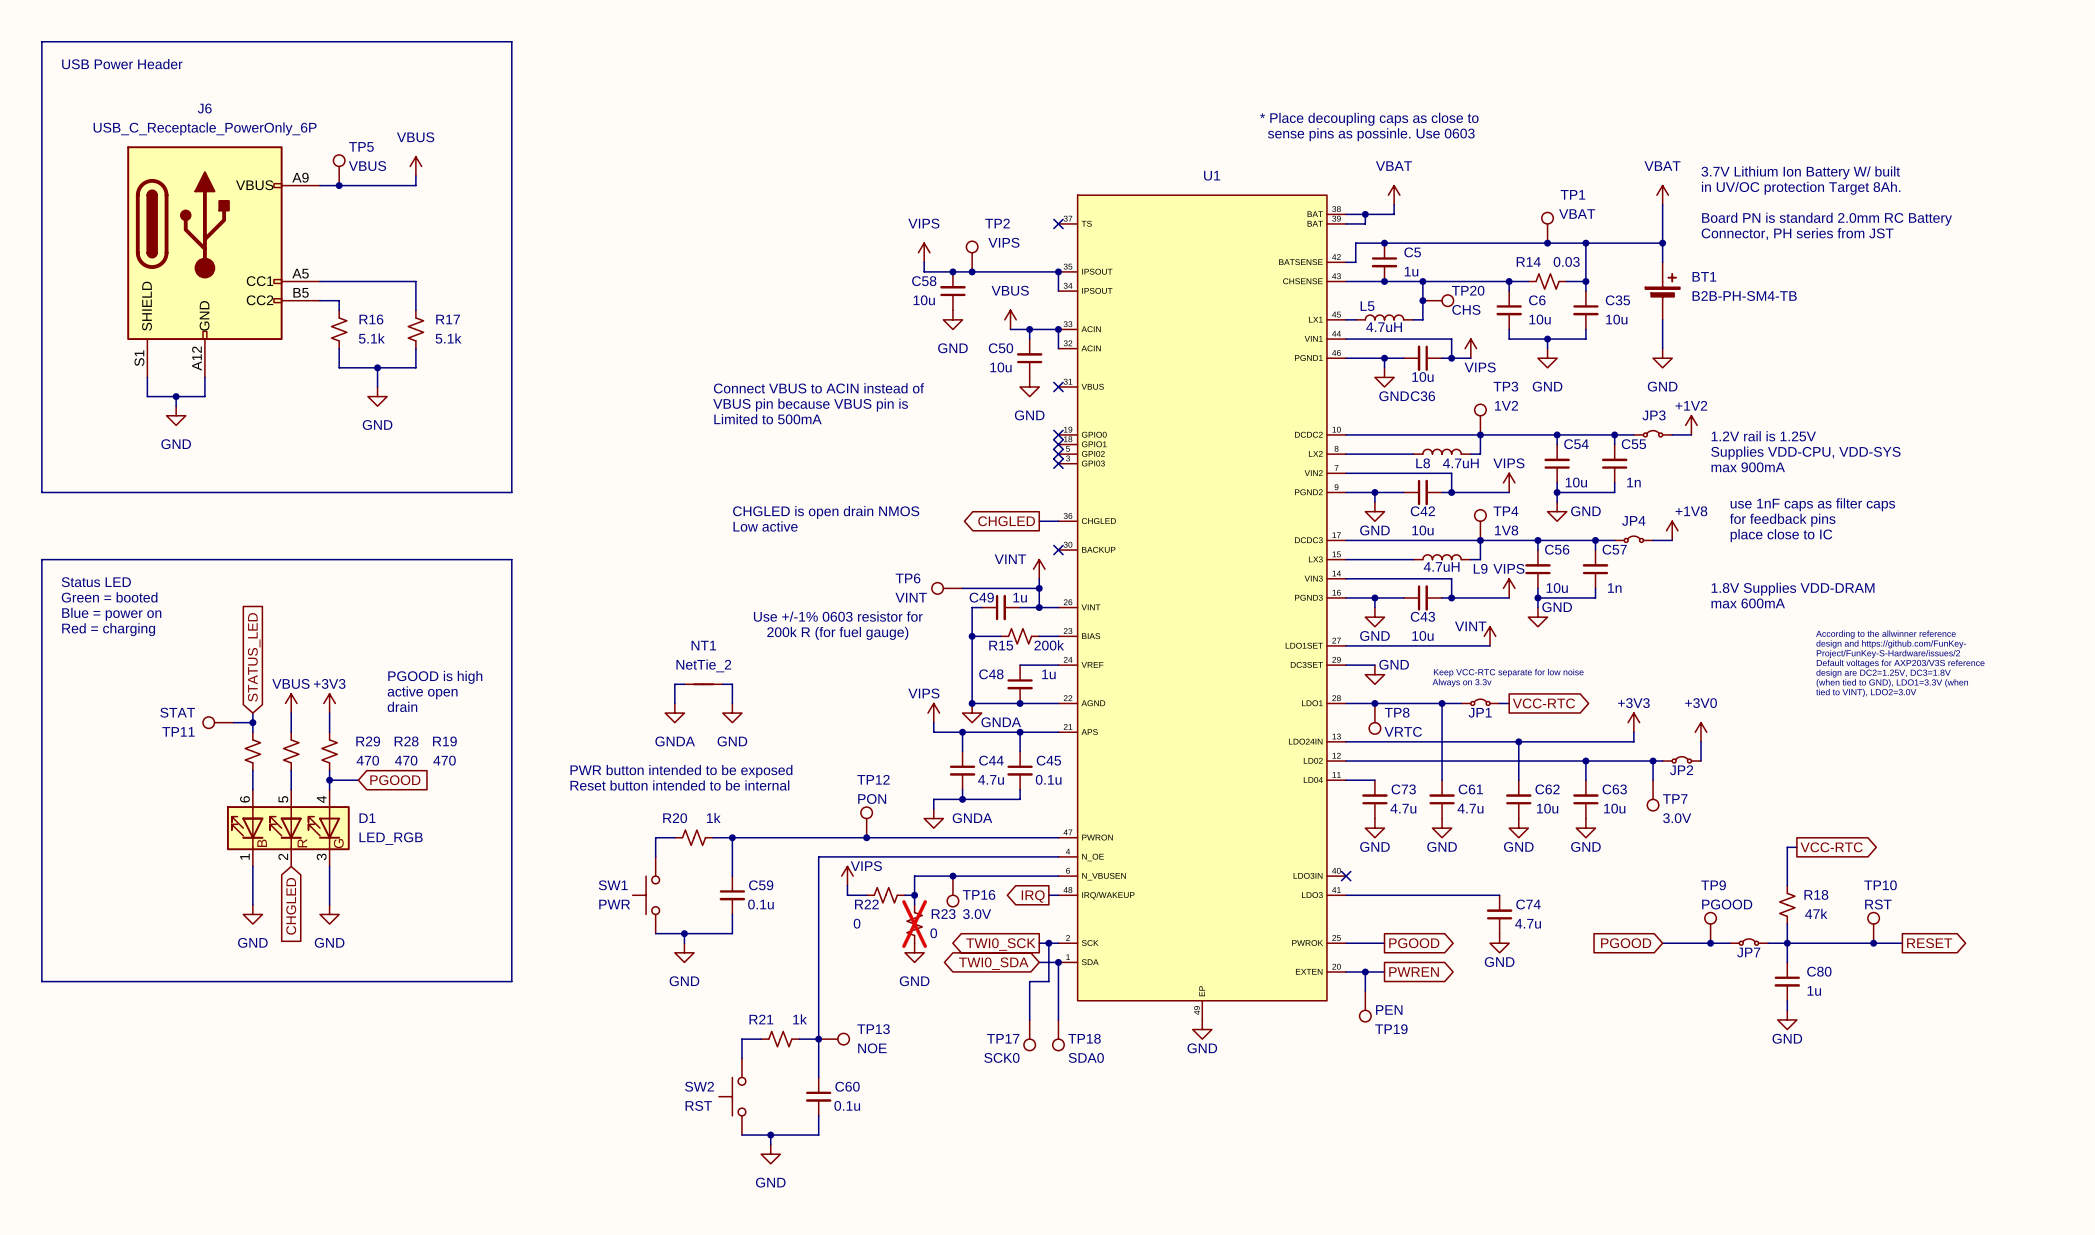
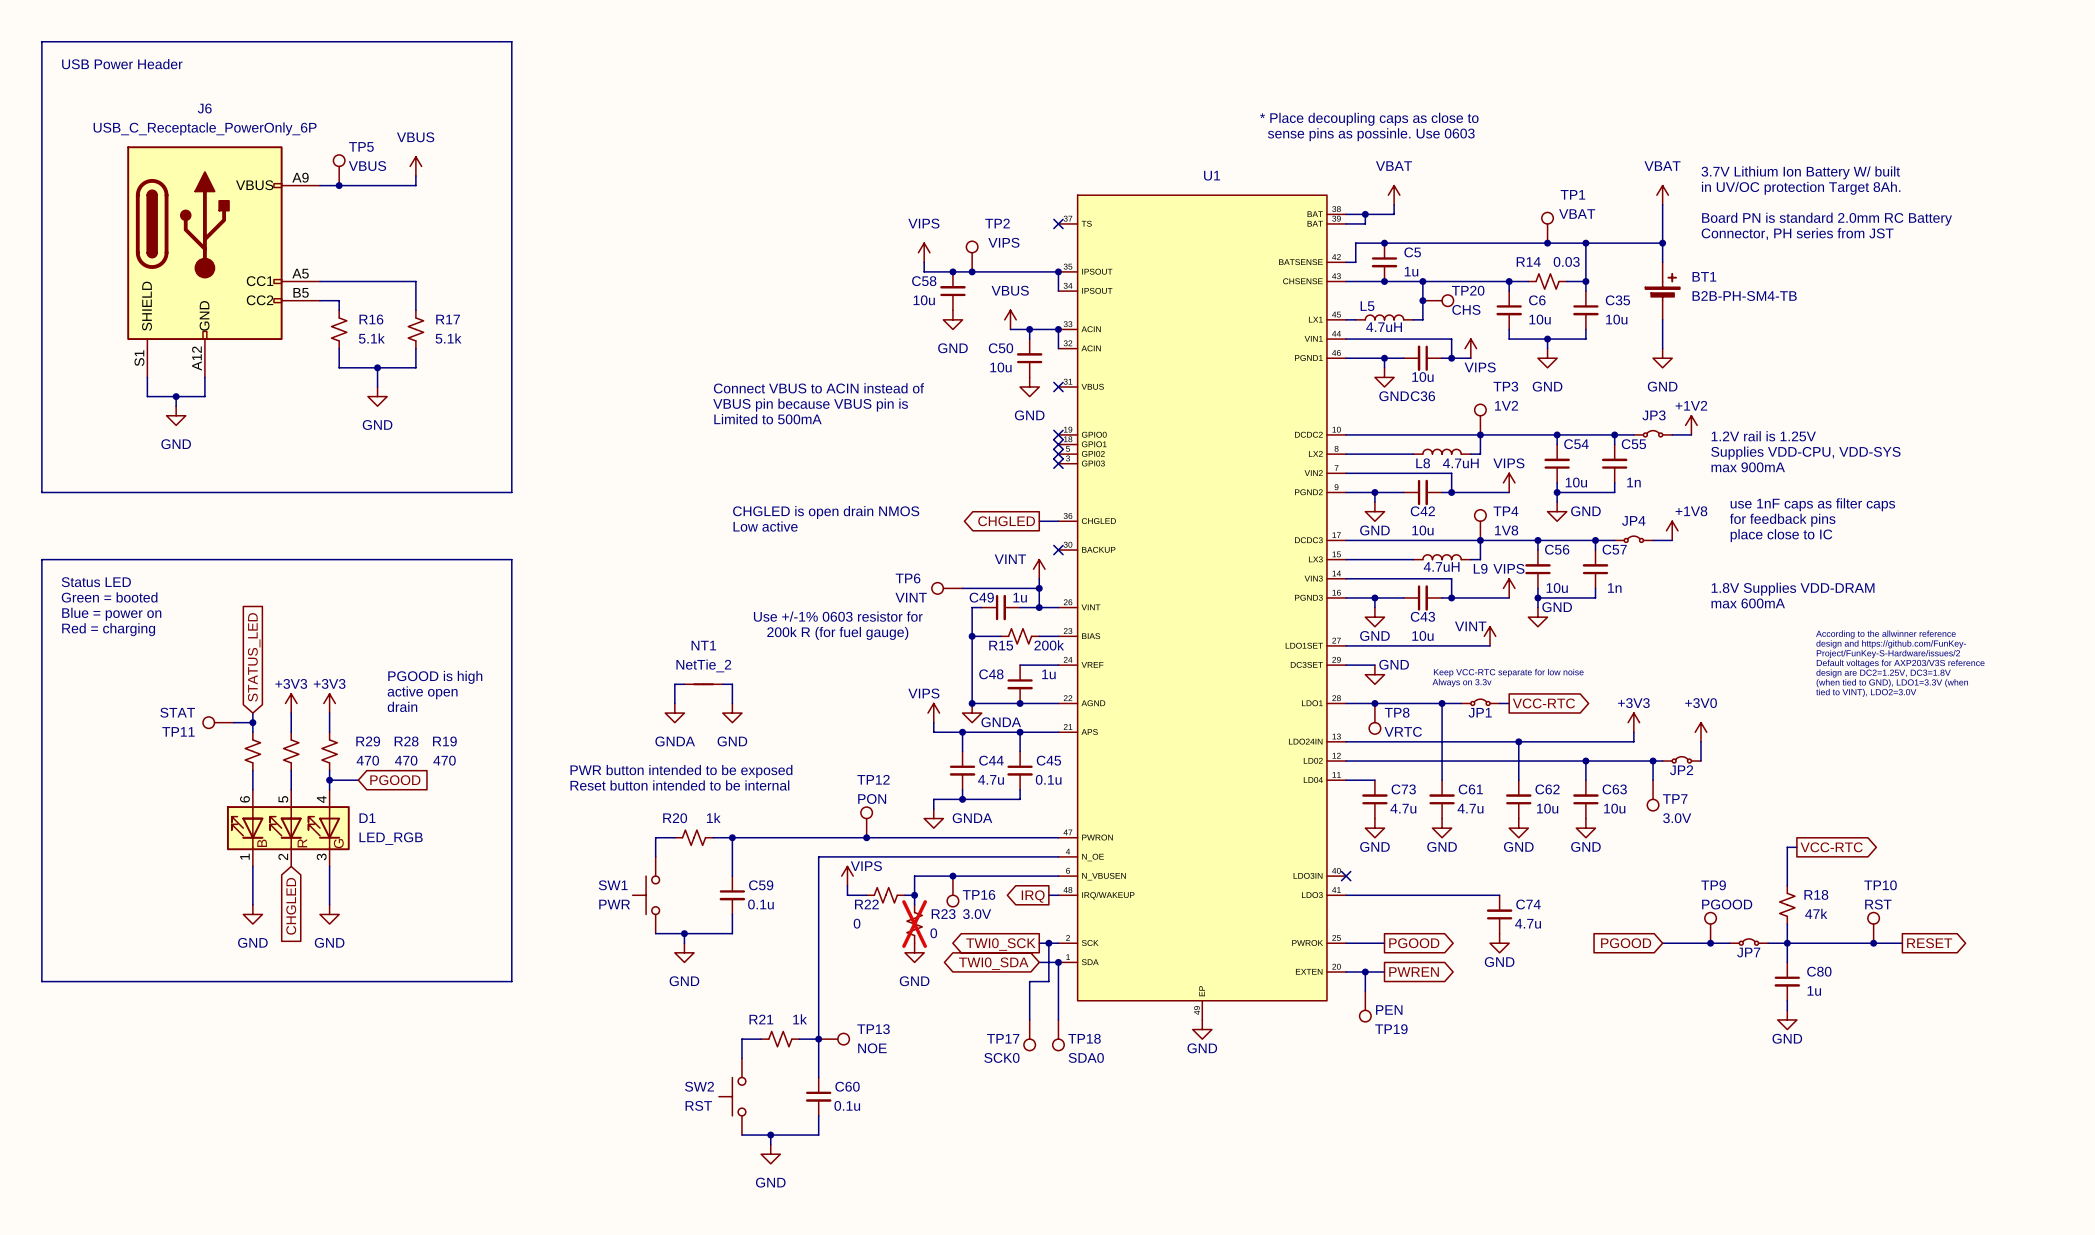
power symbol: VBUS (291, 703) -> +3V3 (291, 703)

